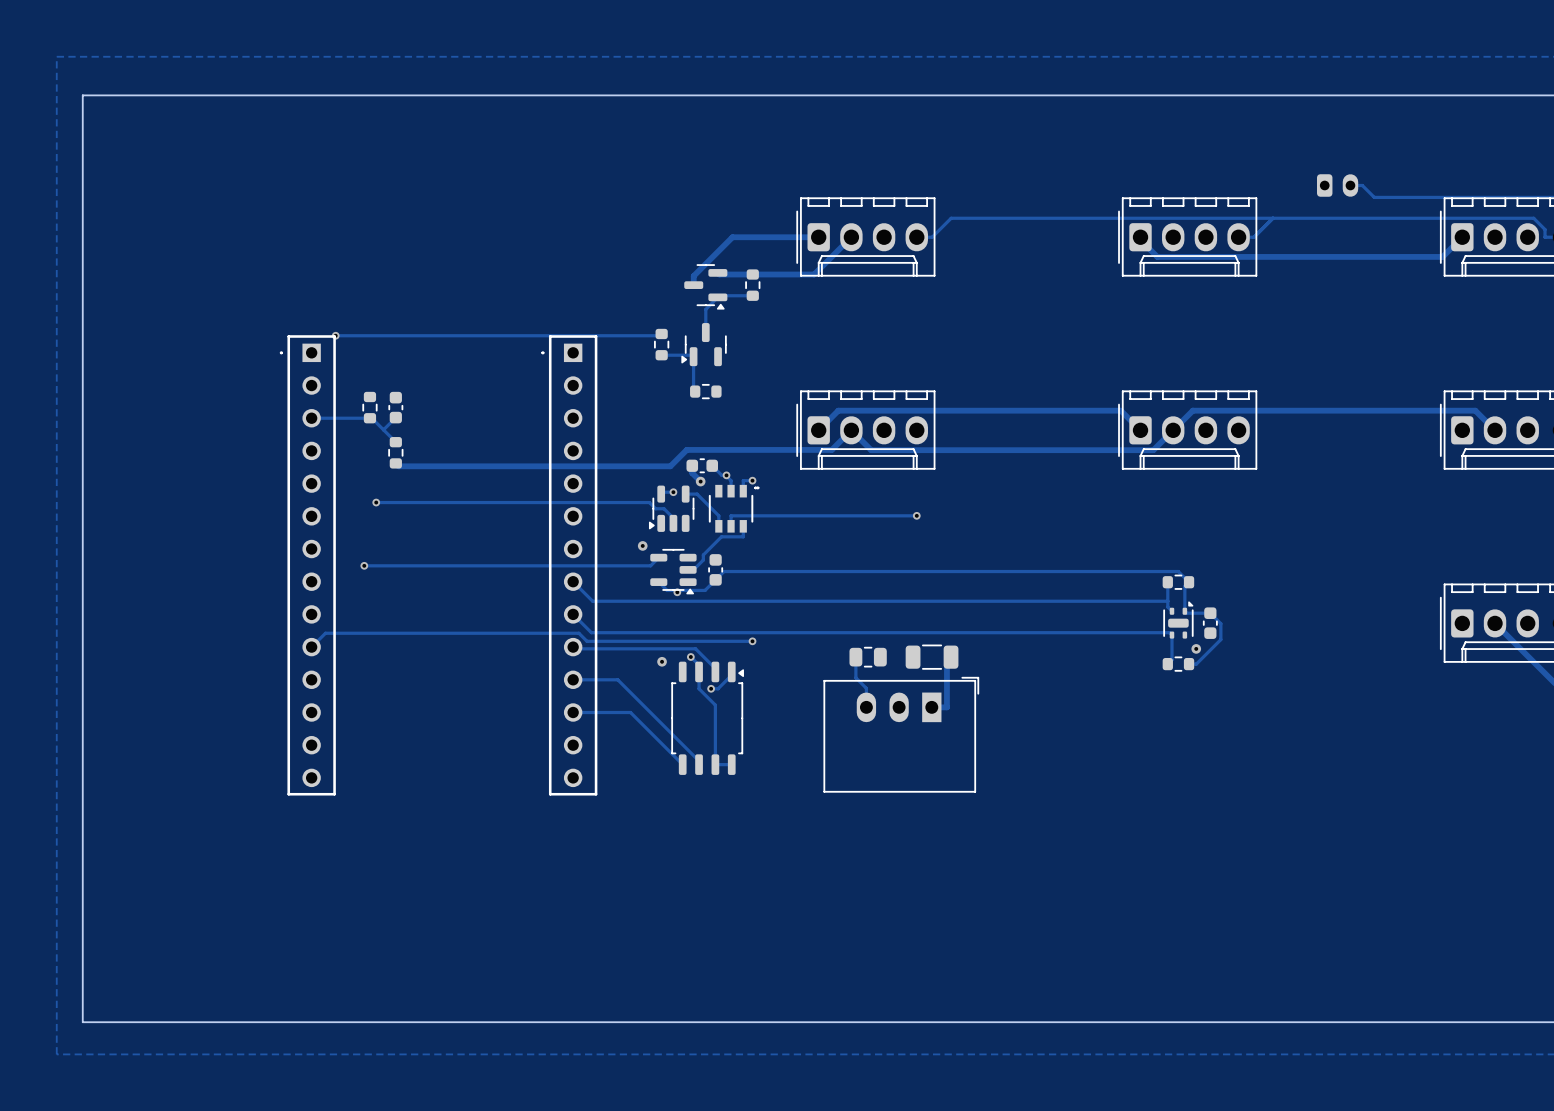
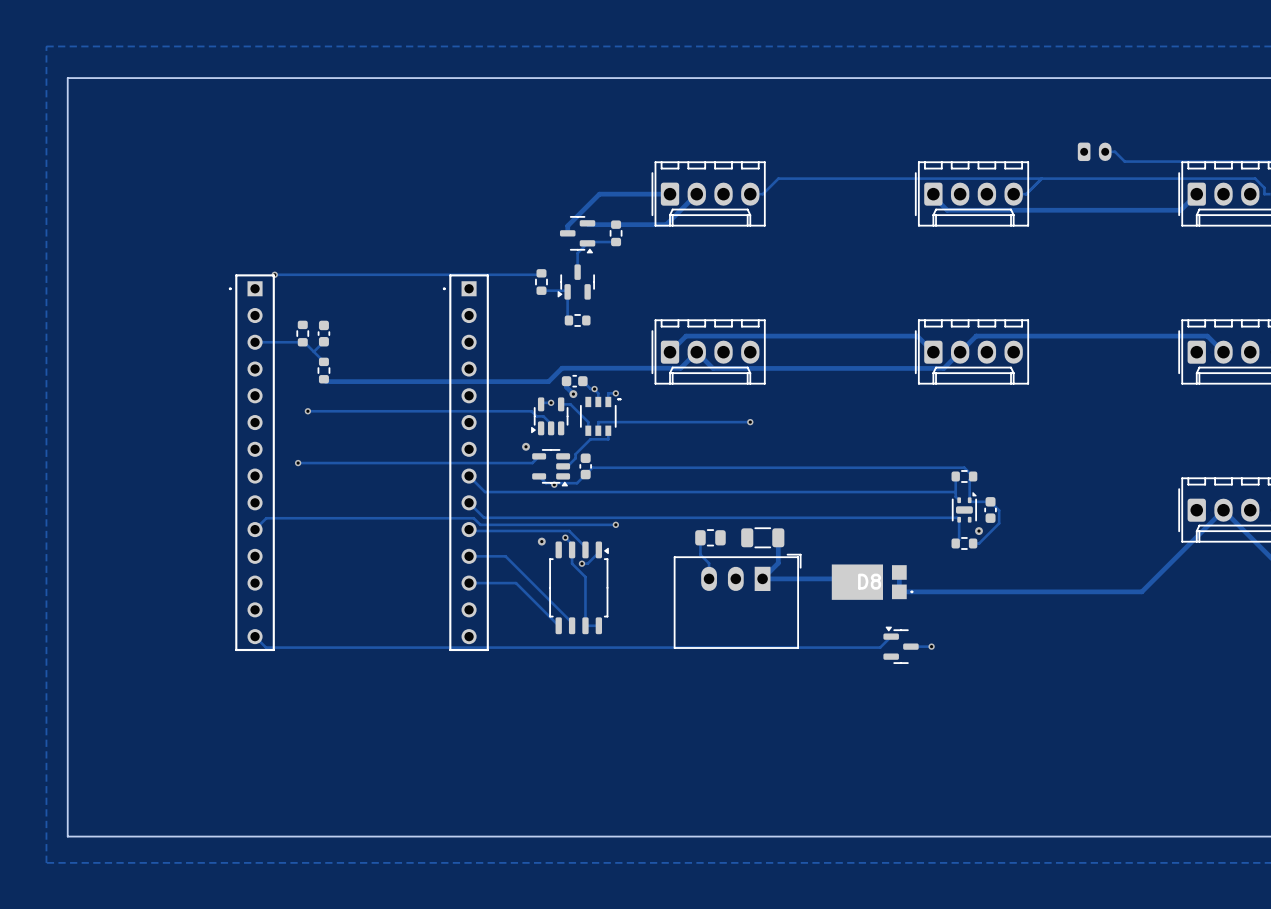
track: none -> (1223, 510) (1141, 591) (899, 591) (899, 572)
track: none -> (778, 537) (778, 563) (762, 578)
track: (946, 661) (946, 707) -> (857, 582) (854, 578) (774, 578)
part: none -> (872, 582)
track: none -> (255, 636) (266, 647) (880, 647) (891, 636)
part: none -> (901, 645)
track: none -> (910, 646) (931, 646)
via: none -> (931, 646)

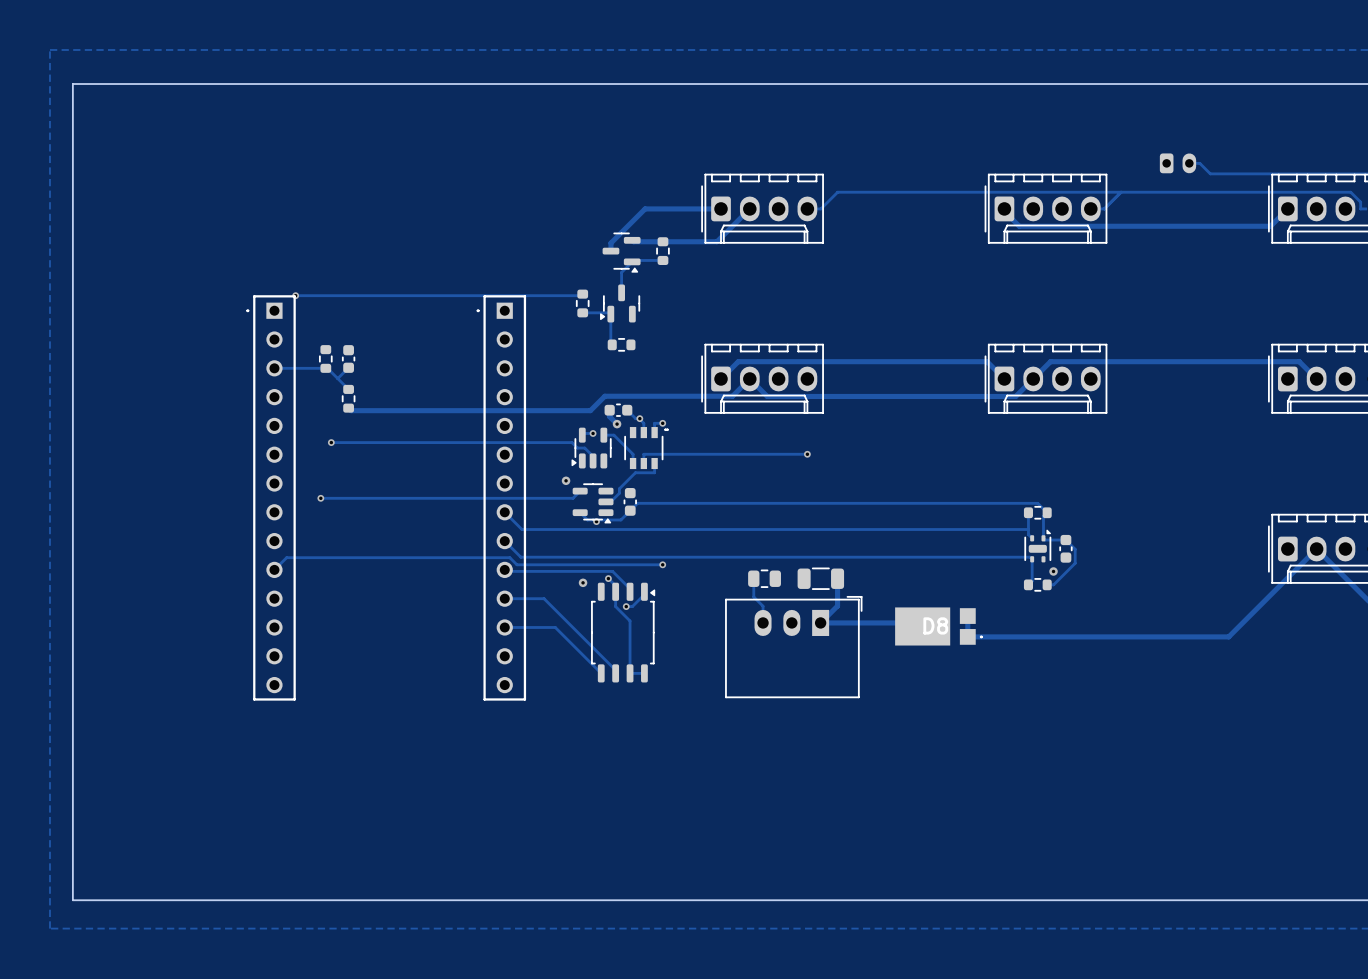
track: (255, 636) (266, 647) (880, 647) (891, 636) -> none
part: (901, 645) -> none
track: (910, 646) (931, 646) -> none
via: (931, 646) -> none

